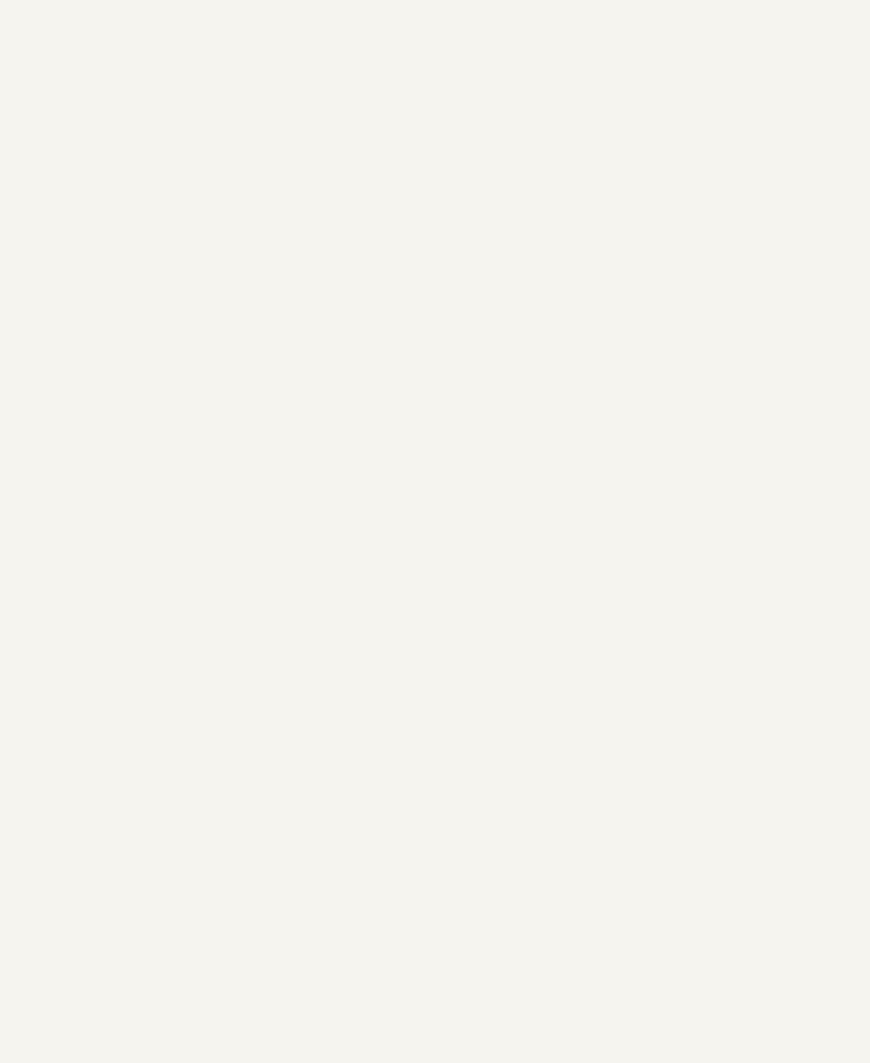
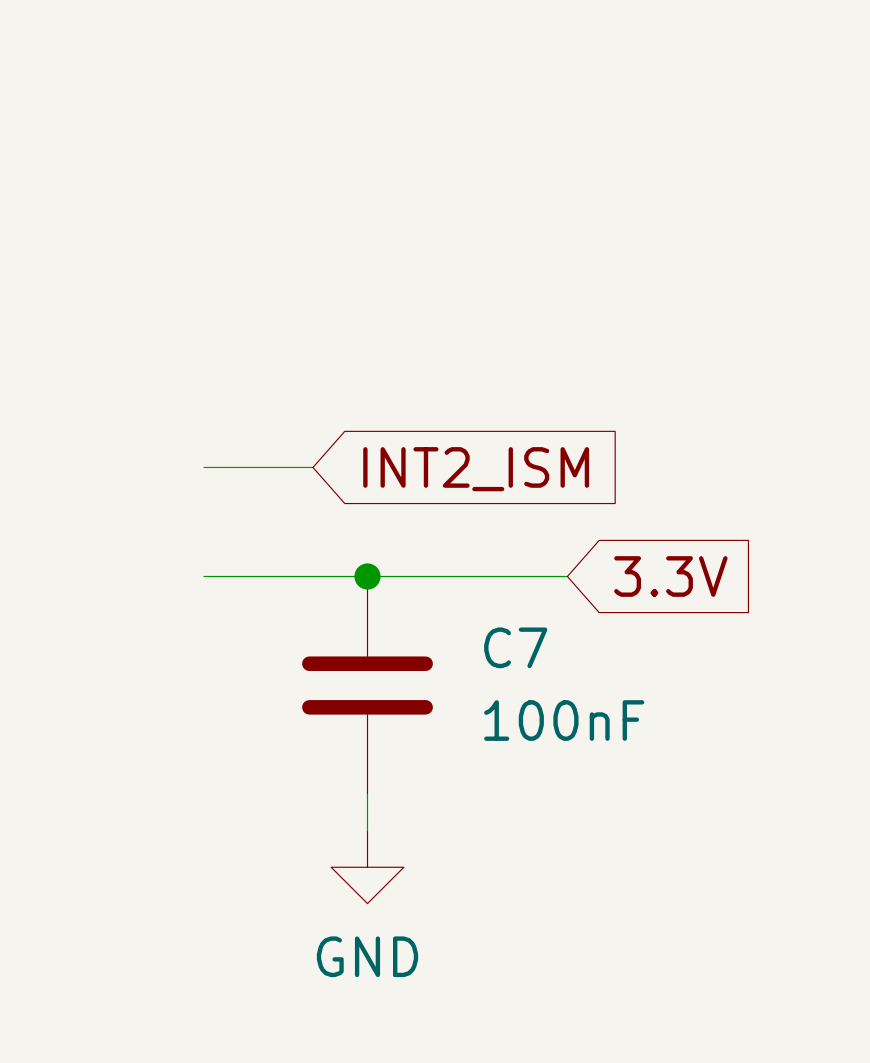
wire: none -> (203, 467) (312, 467)
global label: none -> INT2_ISM (476, 469)
wire: none -> (203, 576) (567, 576)
junction: none -> (367, 576)
global label: none -> 3.3V (670, 576)
C7: none -> 100nF (367, 685)
wire: none -> (367, 794) (367, 830)
power symbol: none -> GND (367, 867)

